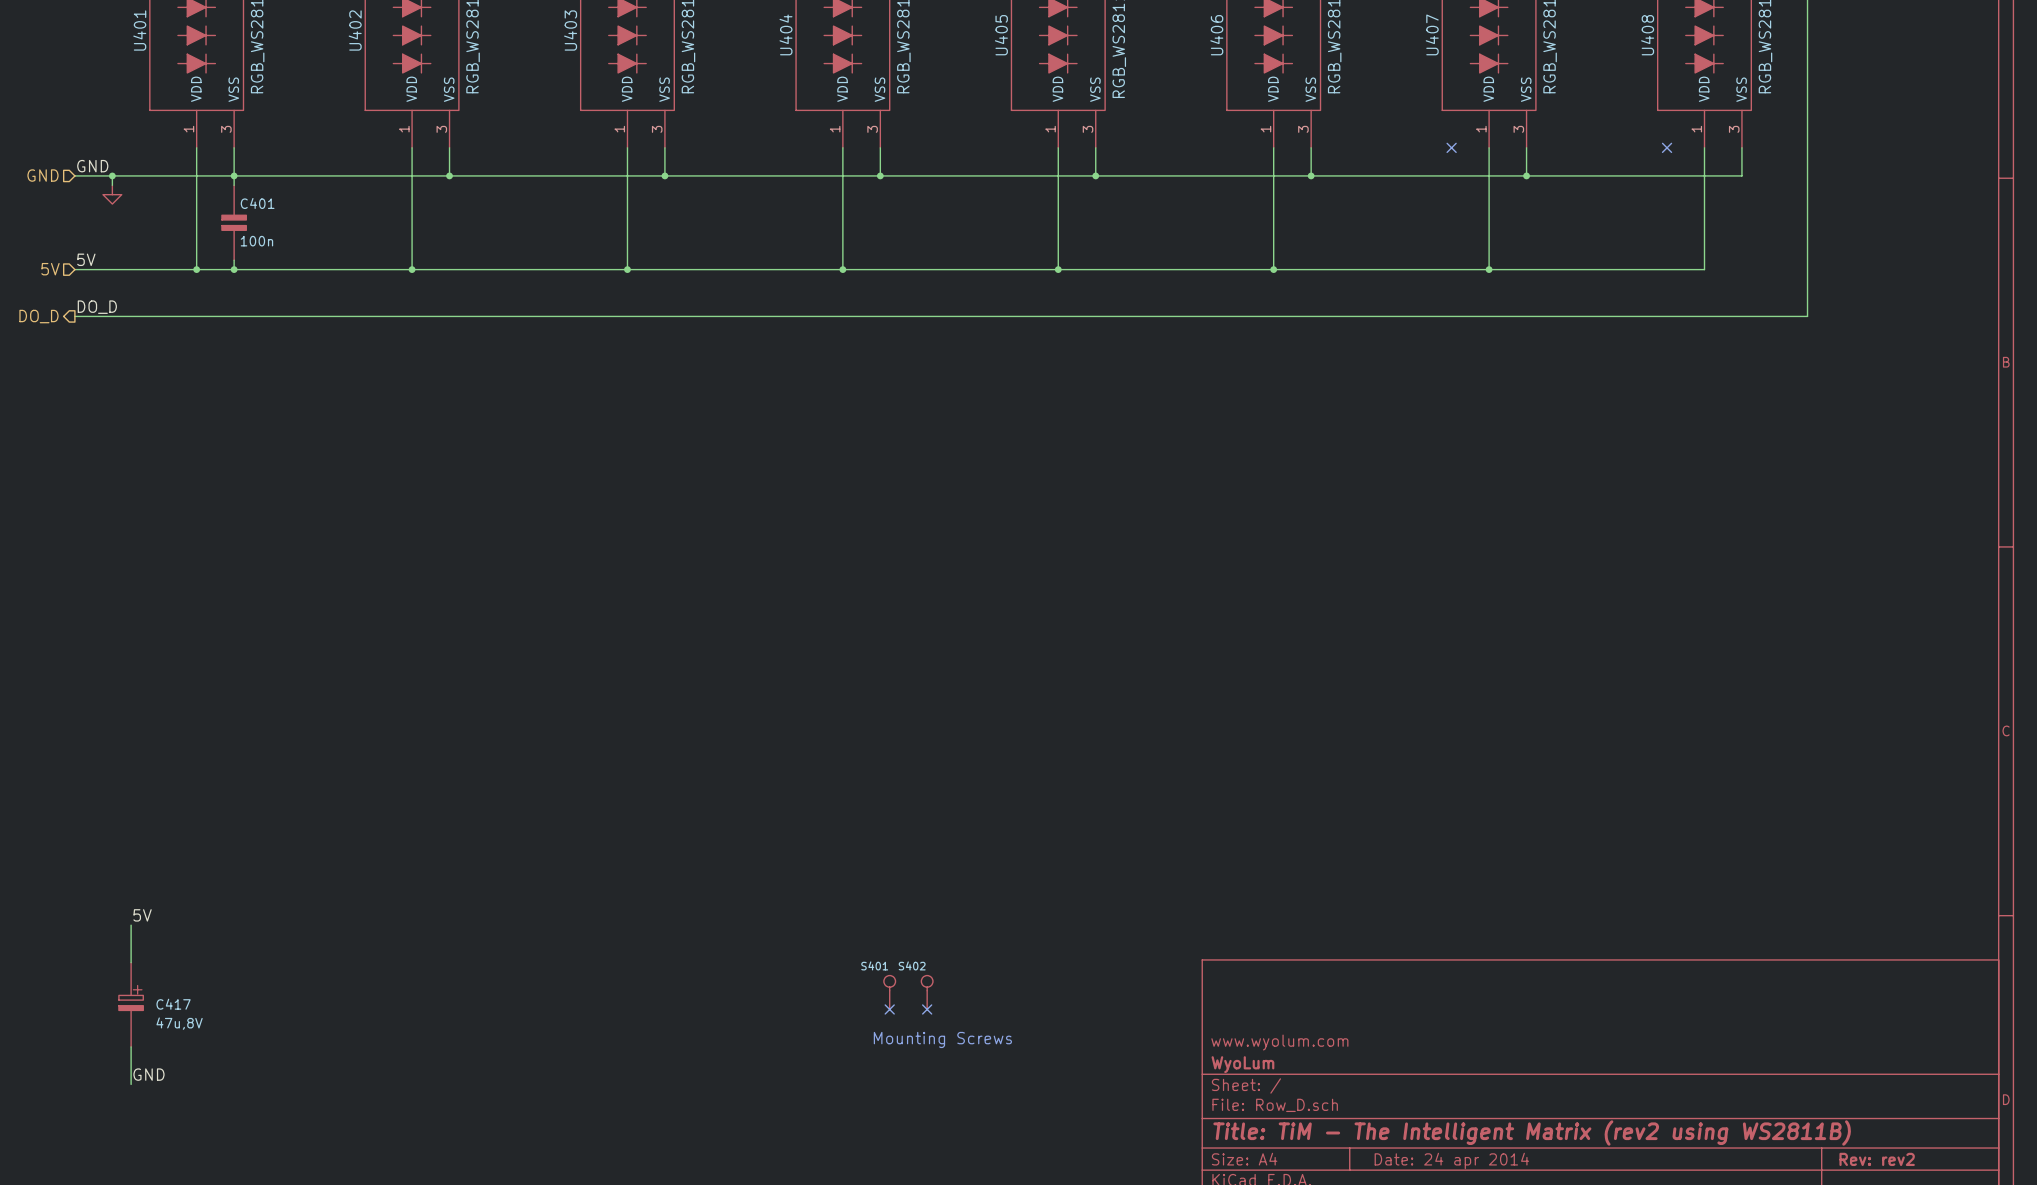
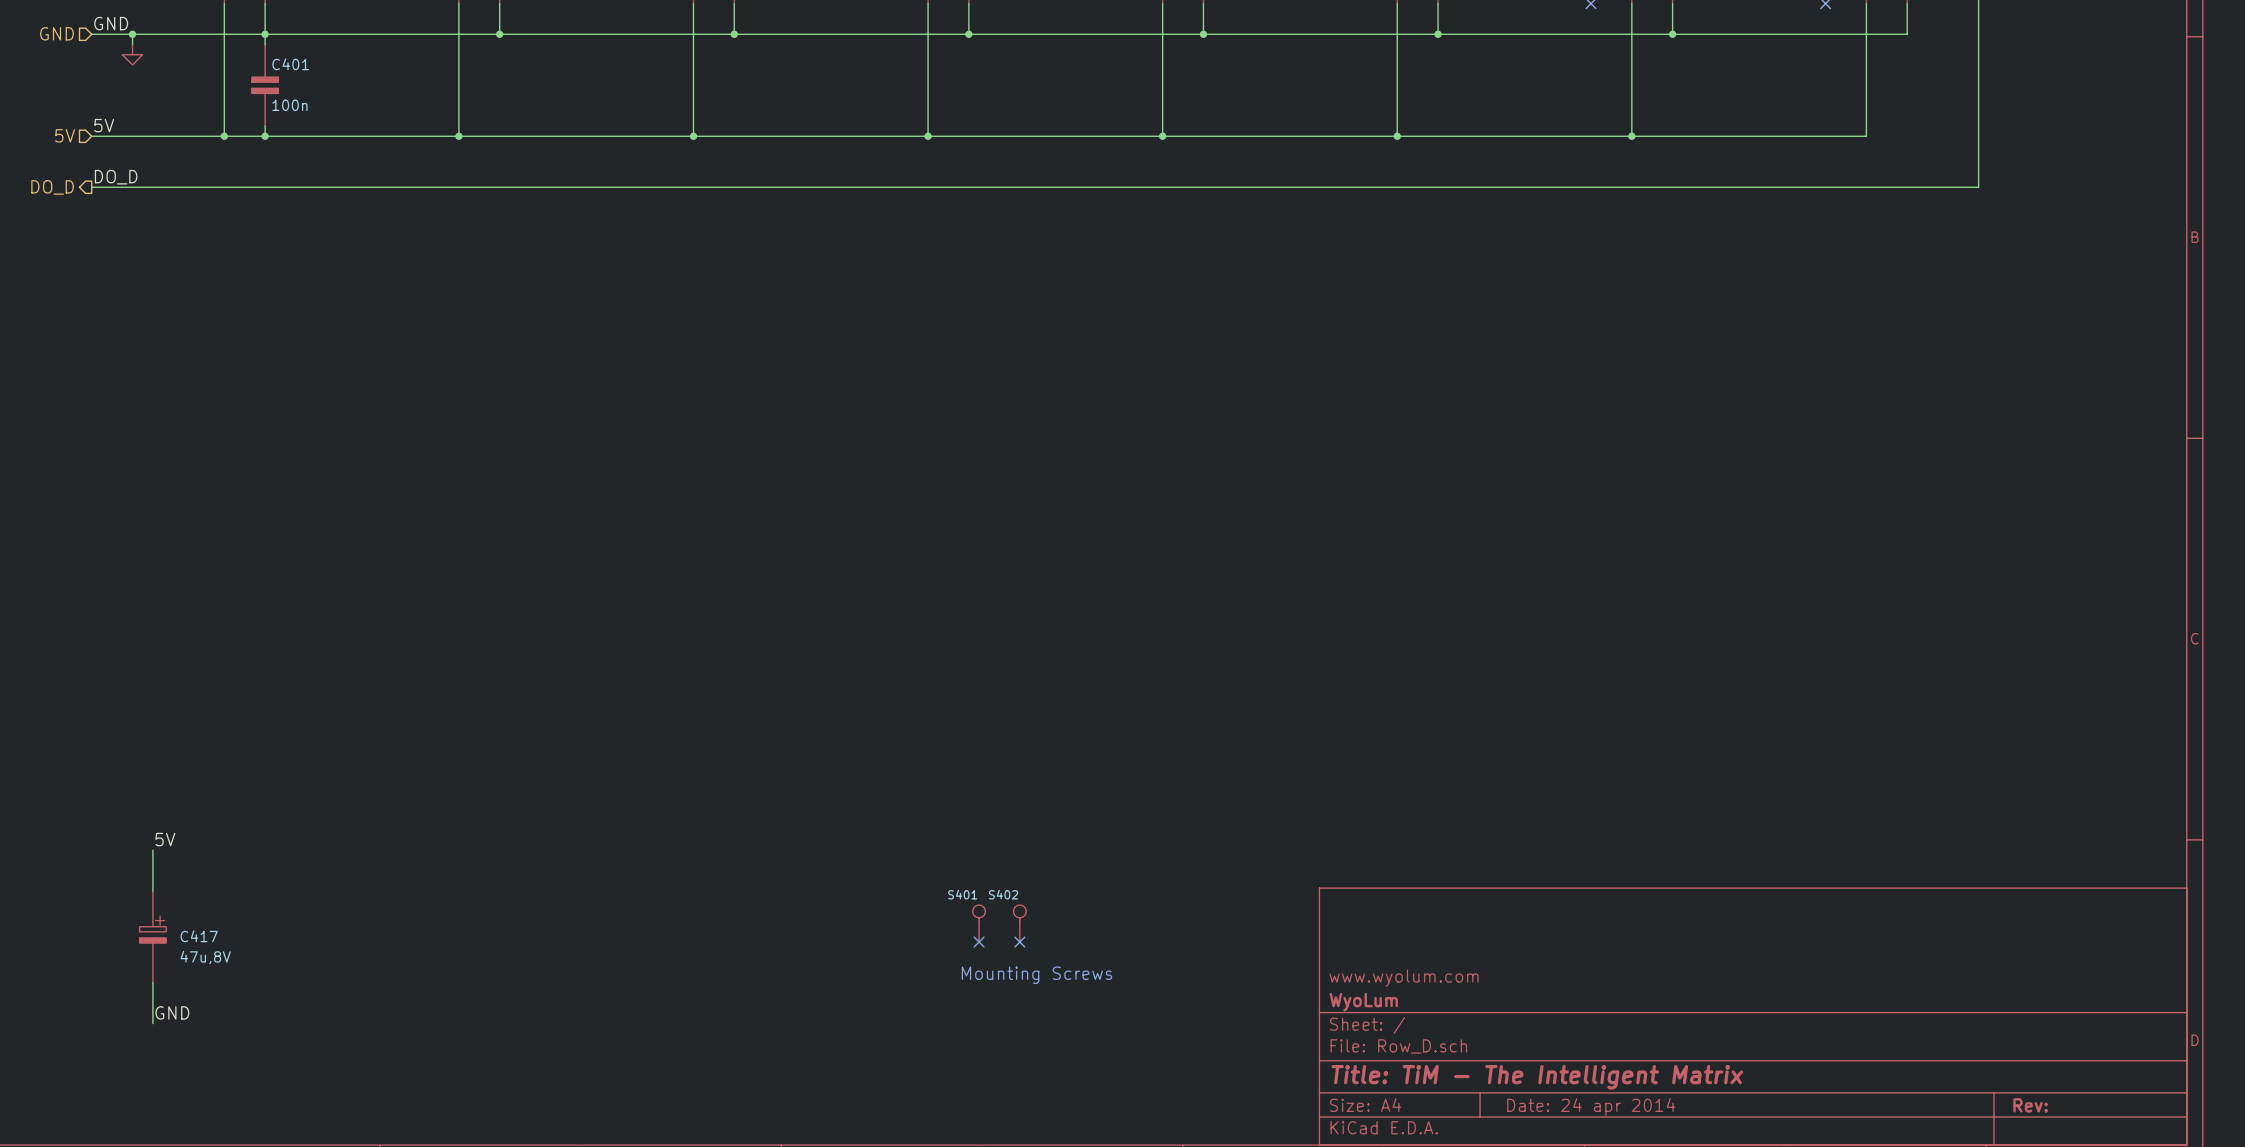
title block: Title: TiM - The Intelligent Matrix (rev2 using WS2811B) (1532, 1133) -> Title: TiM - The Intelligent Matrix (1537, 1077)
title block: Rev: rev2 (1877, 1159) -> Rev: (2030, 1105)

